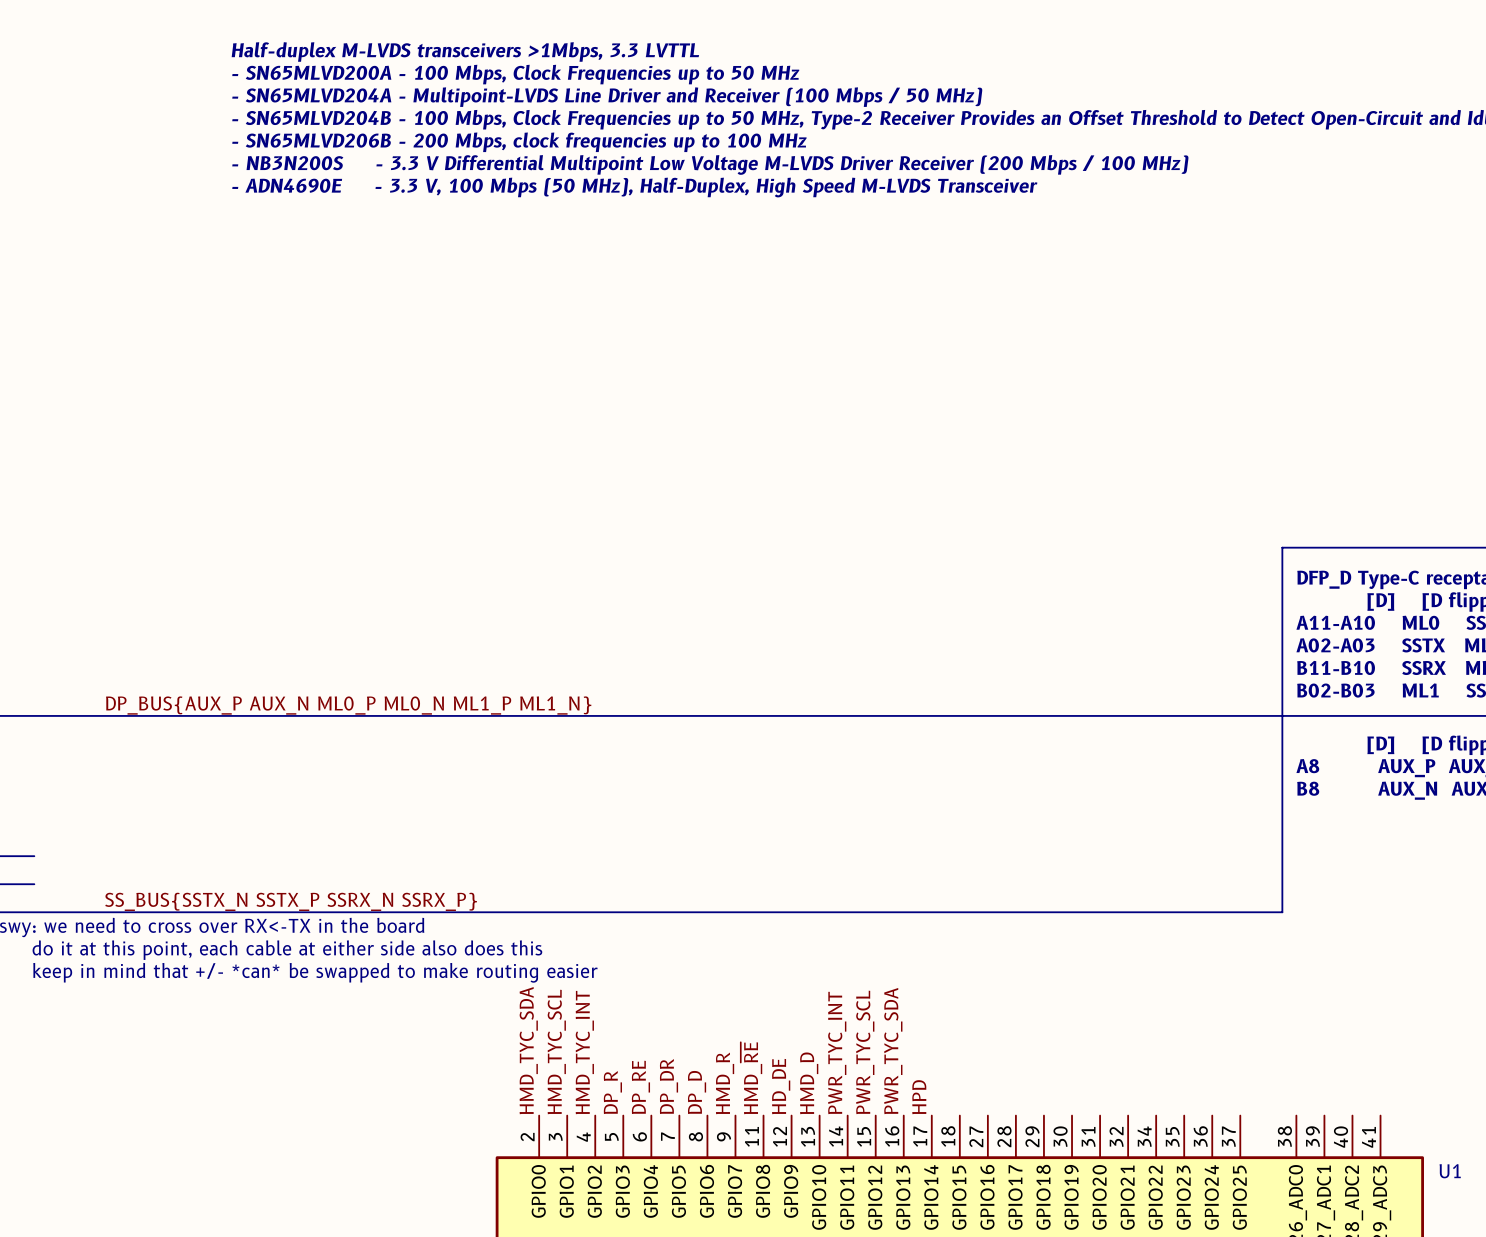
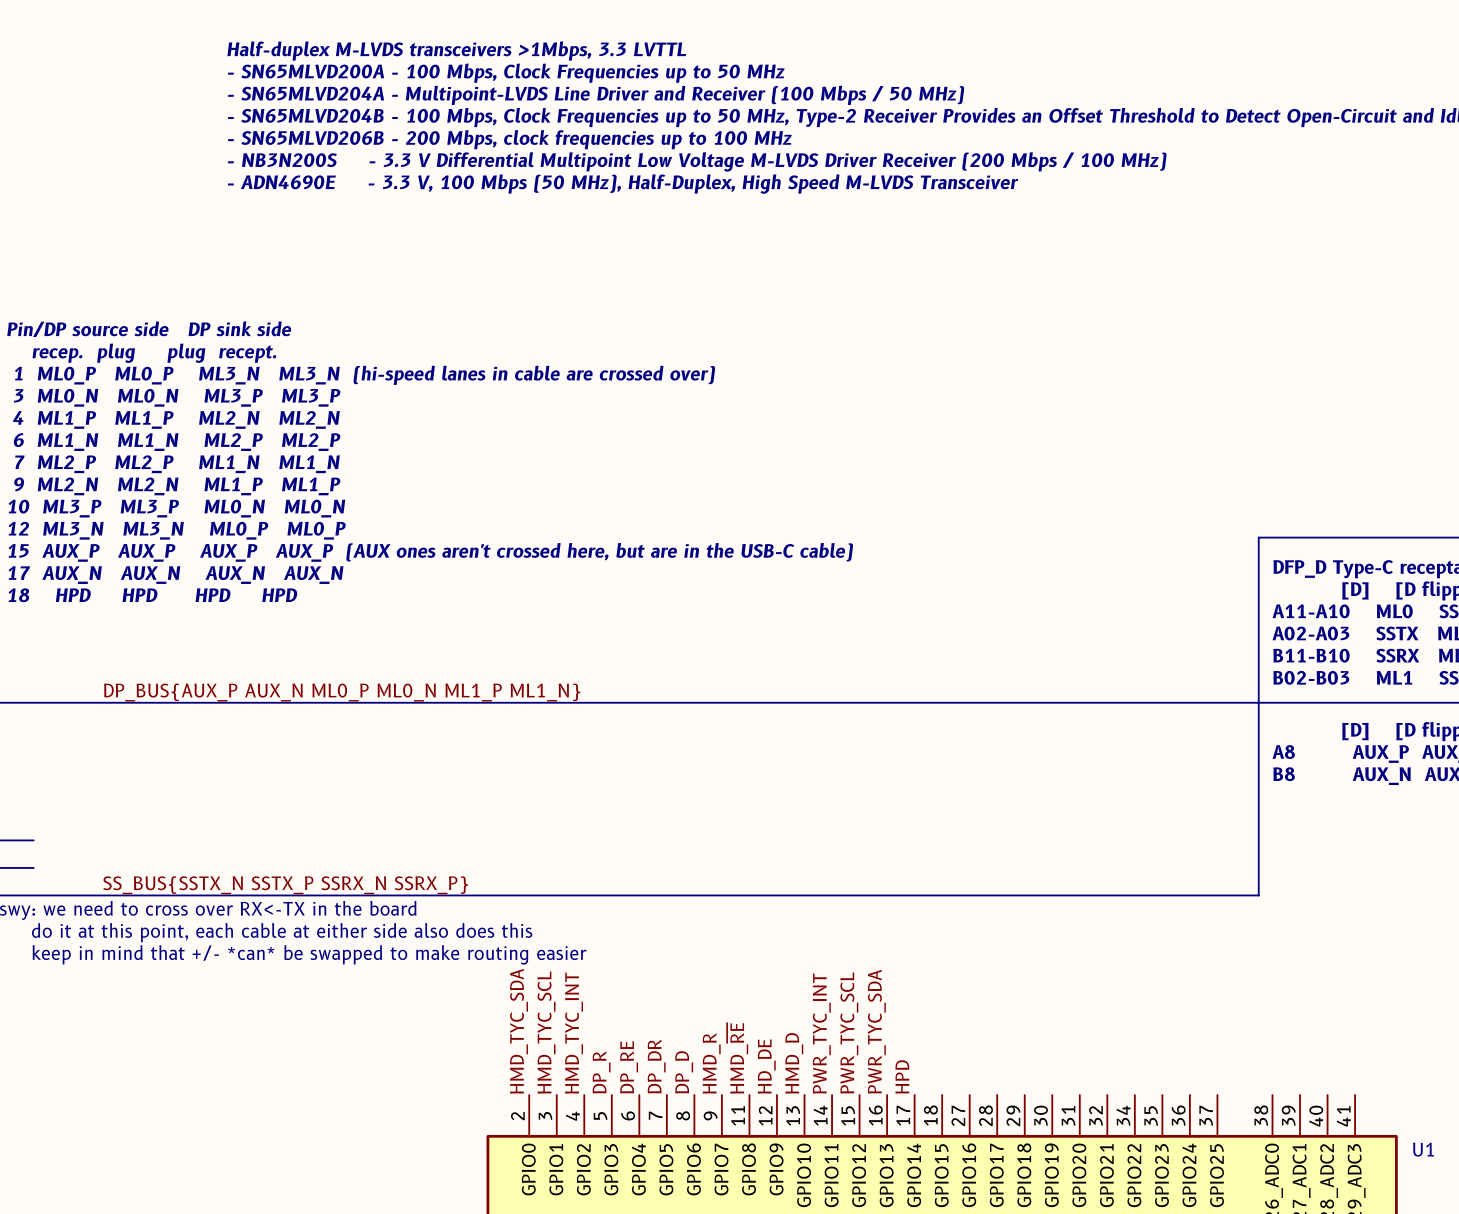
text: none -> Pin/DP source side DP sink side (149, 329)
text: none -> recep. plug plug recept. (154, 353)
text: none -> 1 ML0_P ML0_P ML3_N ML3_N (hi-speed lanes in cable are crossed over) (365, 375)
text: none -> 3 ML0_N ML0_N ML3_P ML3_P (177, 397)
text: none -> 4 ML1_P ML1_P ML2_N ML2_N (176, 419)
text: none -> 6 ML1_N ML1_N ML2_P ML2_P (177, 442)
text: none -> 7 ML2_P ML2_P ML1_N ML1_N (177, 464)
text: none -> 9 ML2_N ML2_N ML1_P ML1_P (177, 486)
text: none -> 10 ML3_P ML3_P ML0_N ML0_N (176, 508)
text: none -> 12 ML3_N ML3_N ML0_P ML0_P (177, 530)
text: none -> 15 AUX_P AUX_P AUX_P AUX_P (AUX ones aren't crossed here, but are in the USB-C cable) (430, 552)
text: none -> 17 AUX_N AUX_N AUX_N AUX_N (176, 575)
text: none -> 18 HPD HPD HPD HPD (152, 595)

